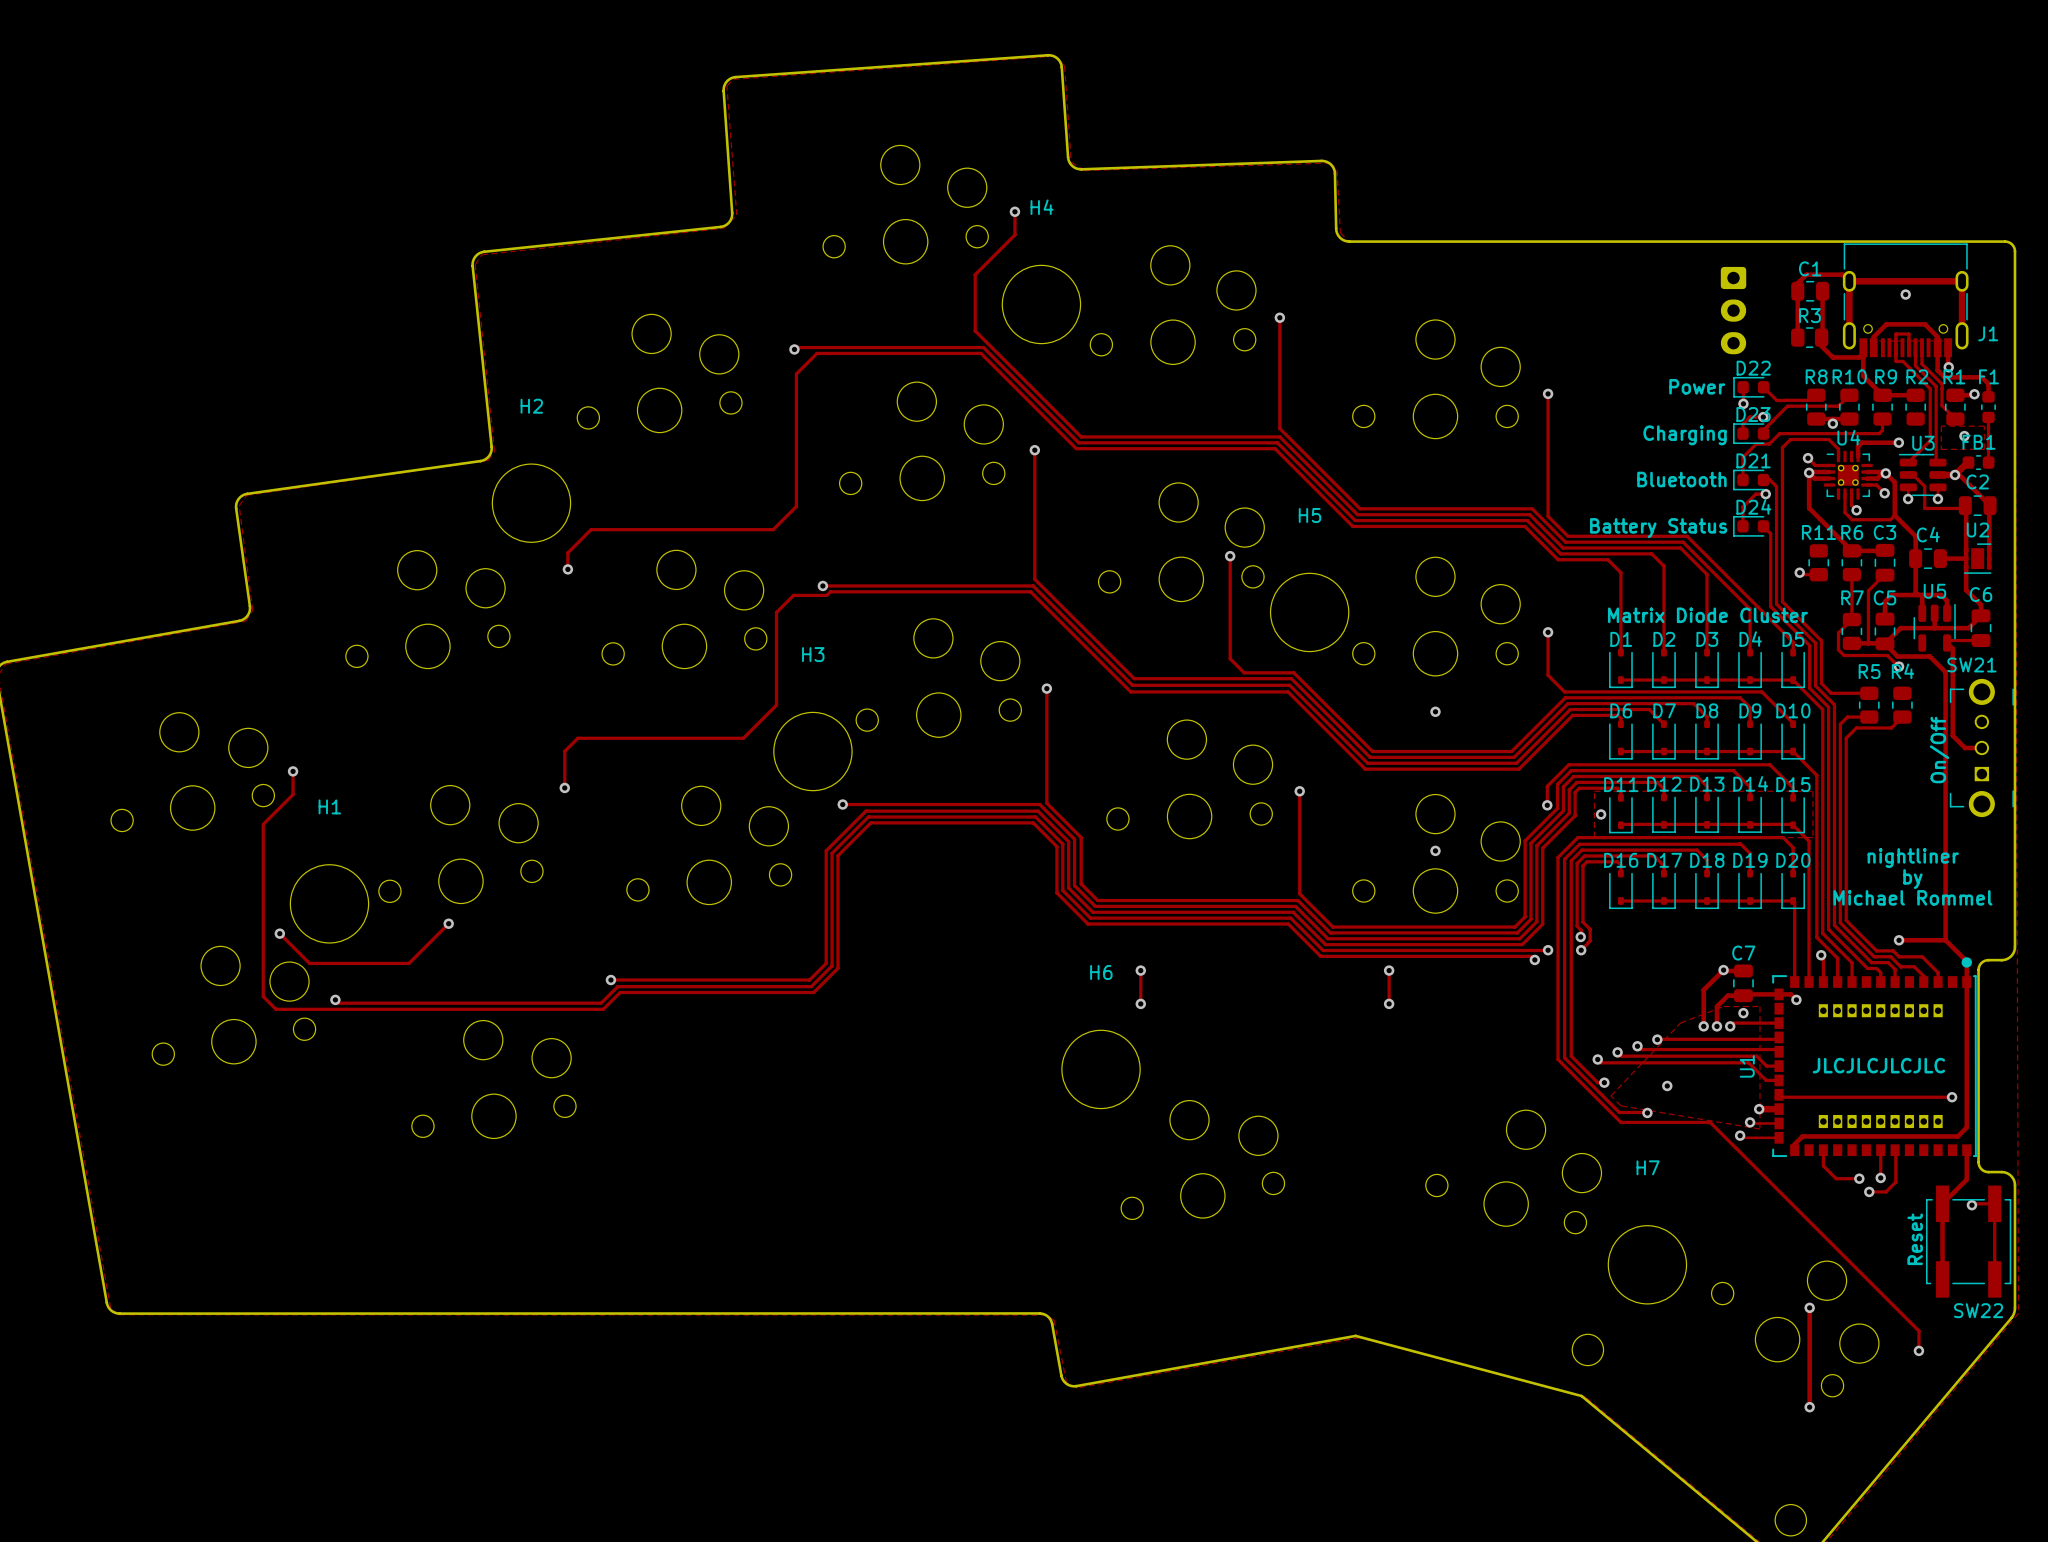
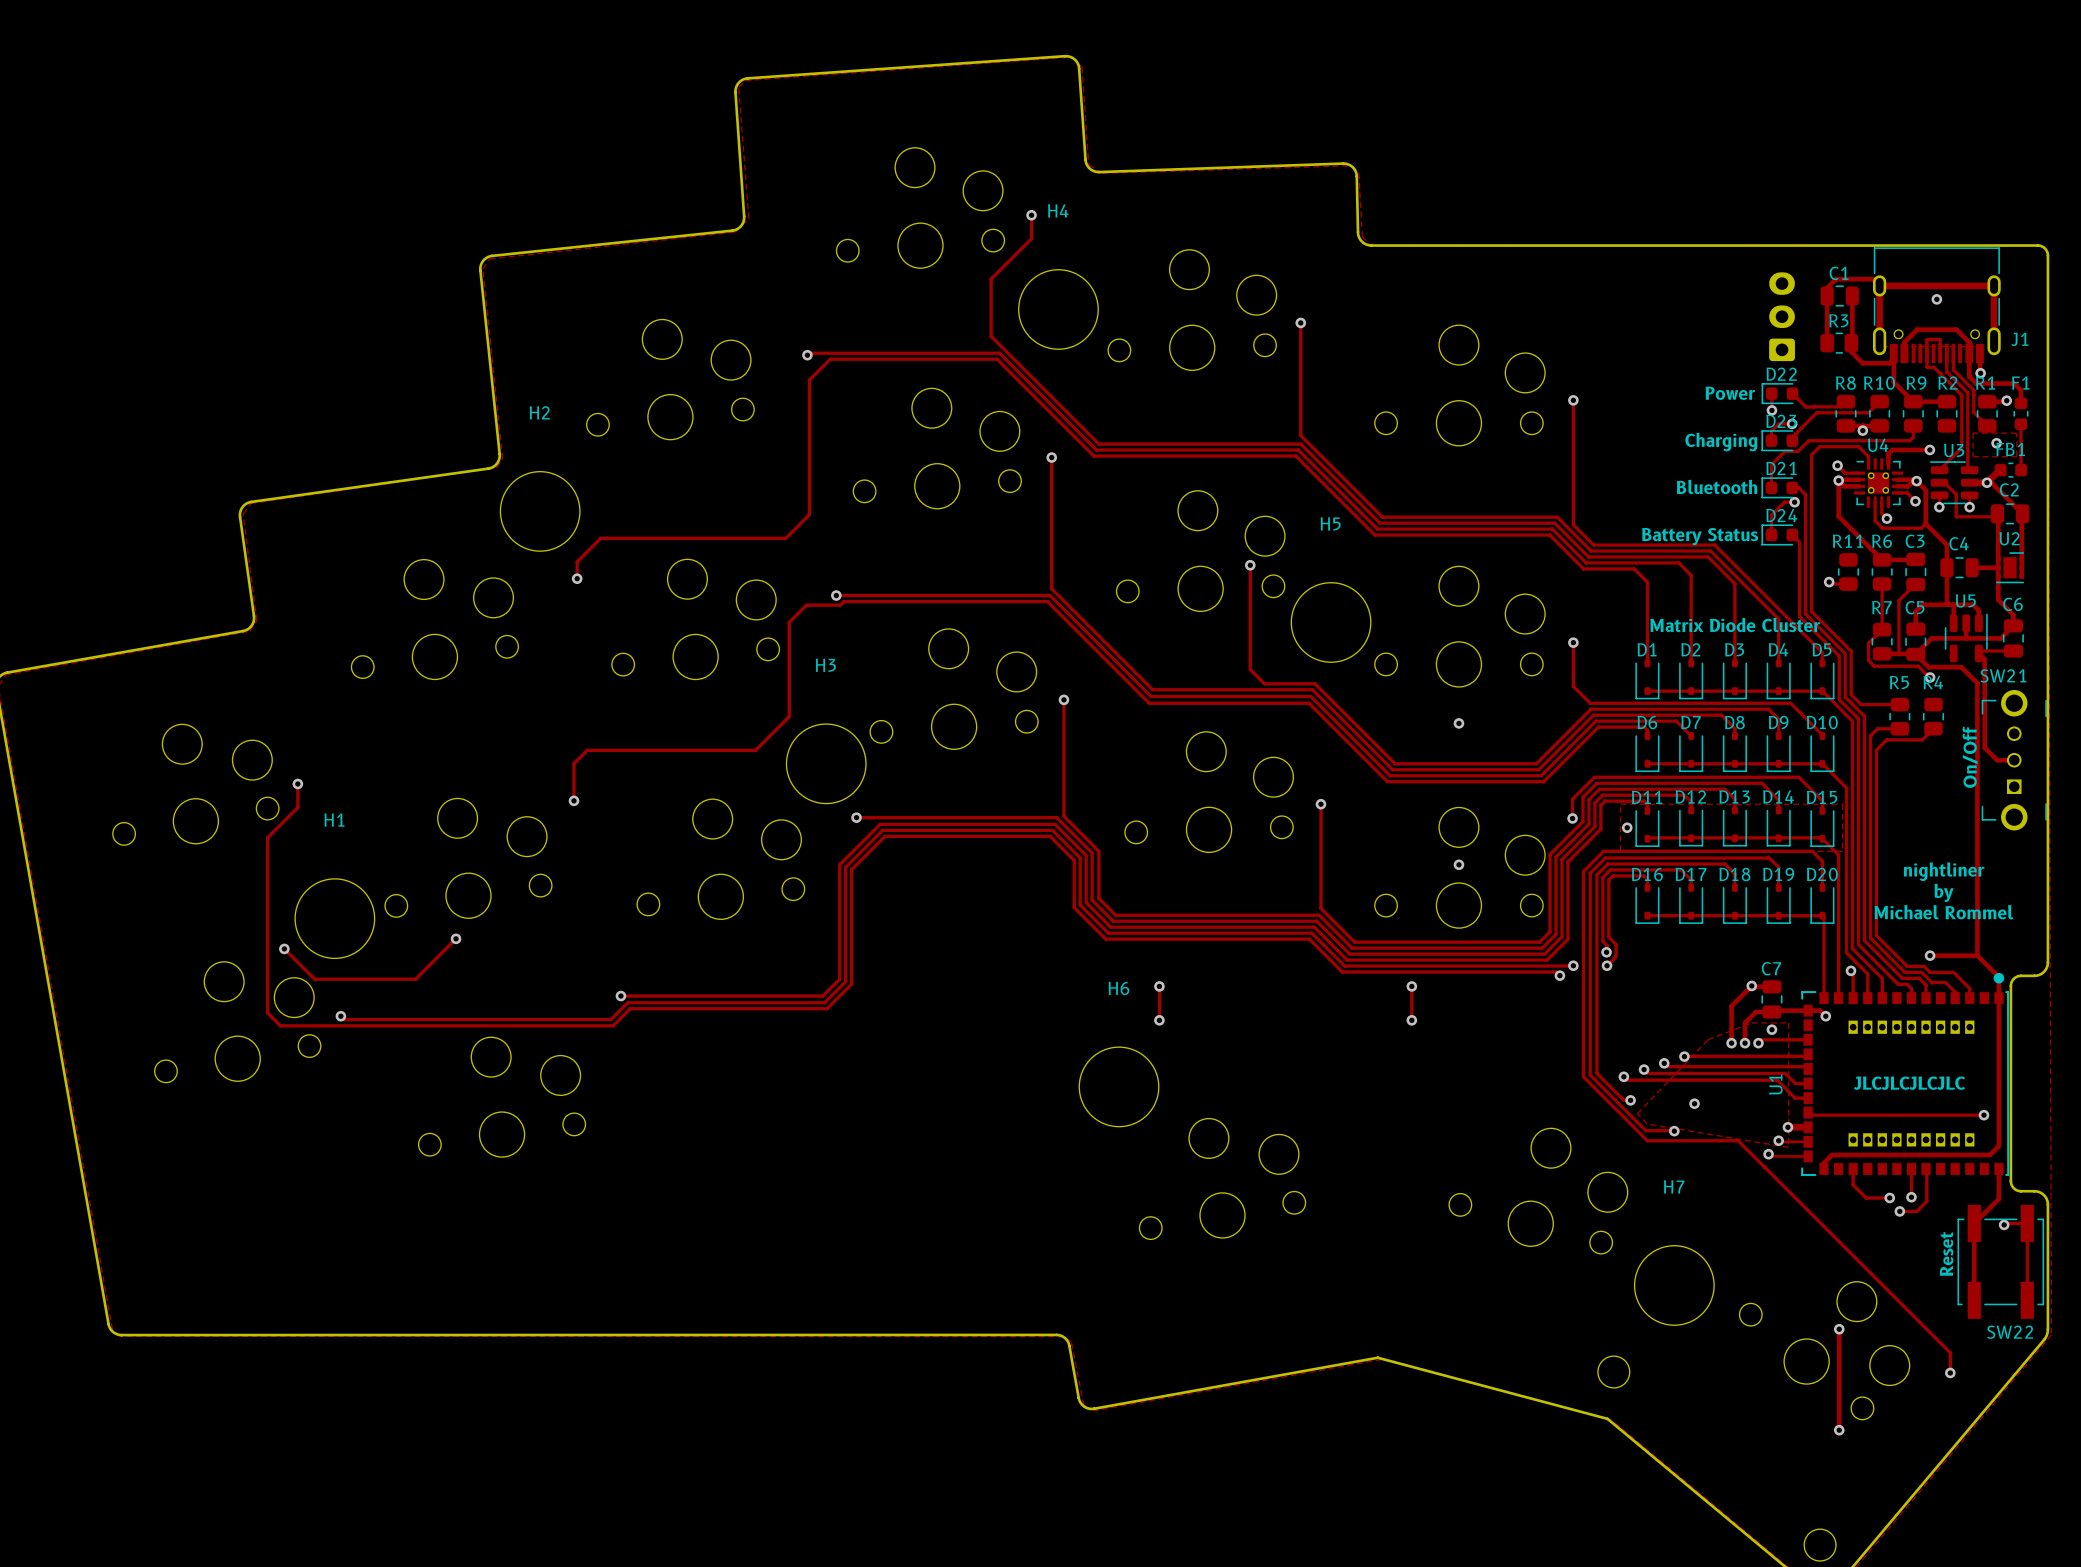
part rotation: 0° (1733, 310) -> 180° (1782, 316)

